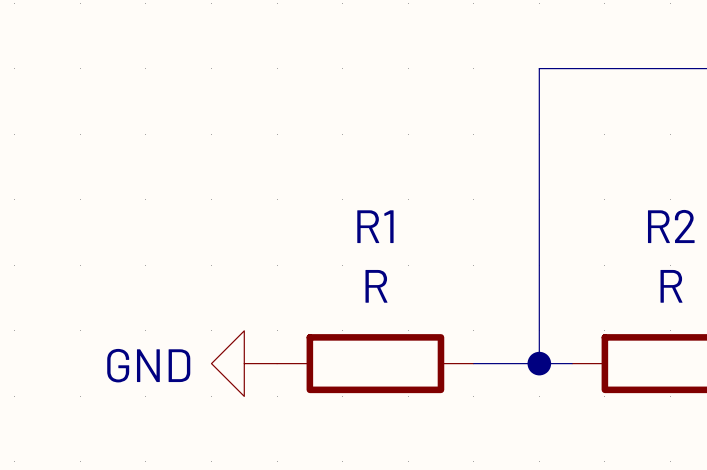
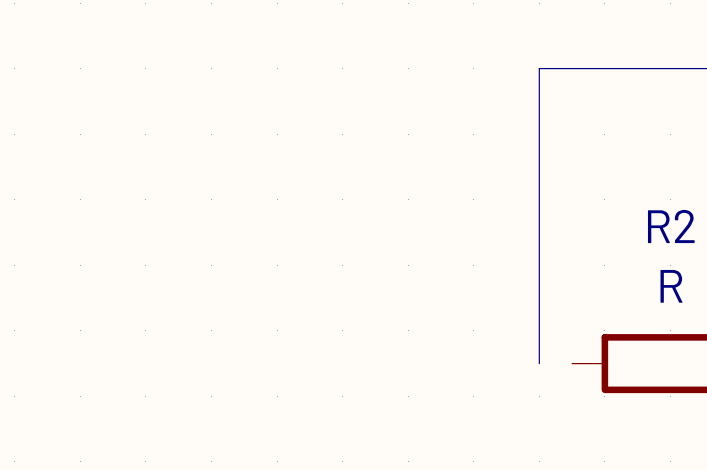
power symbol: GND (244, 363) -> none
R1: R (375, 363) -> none
wire: (473, 363) (572, 363) -> none
junction: (539, 363) -> none

